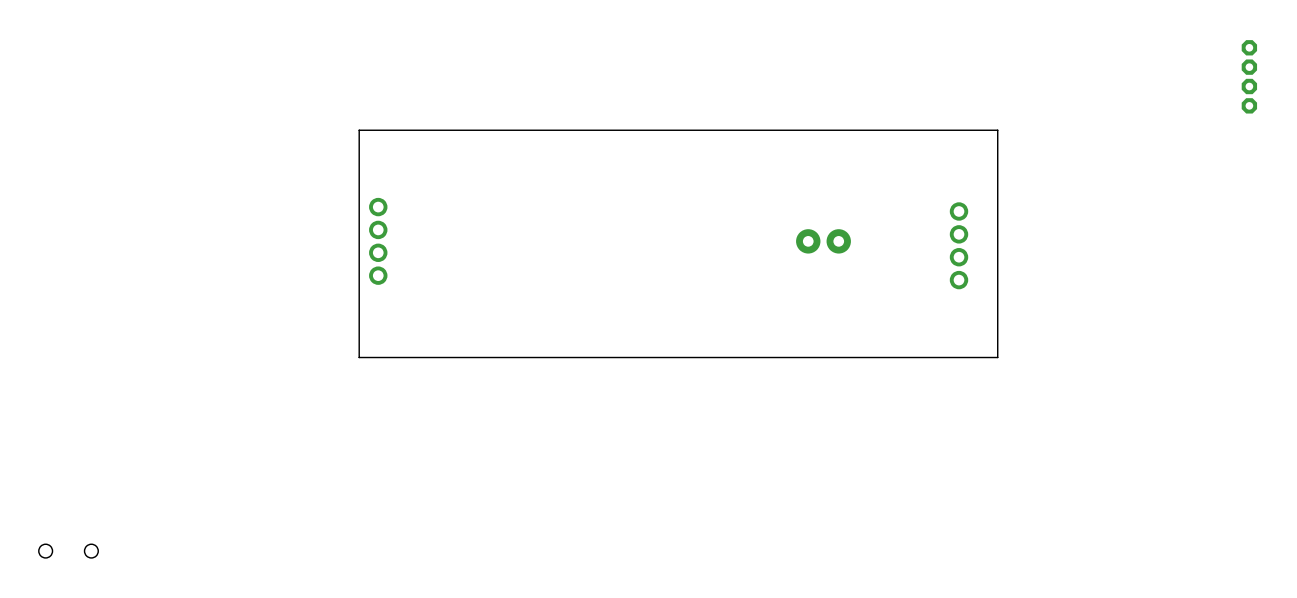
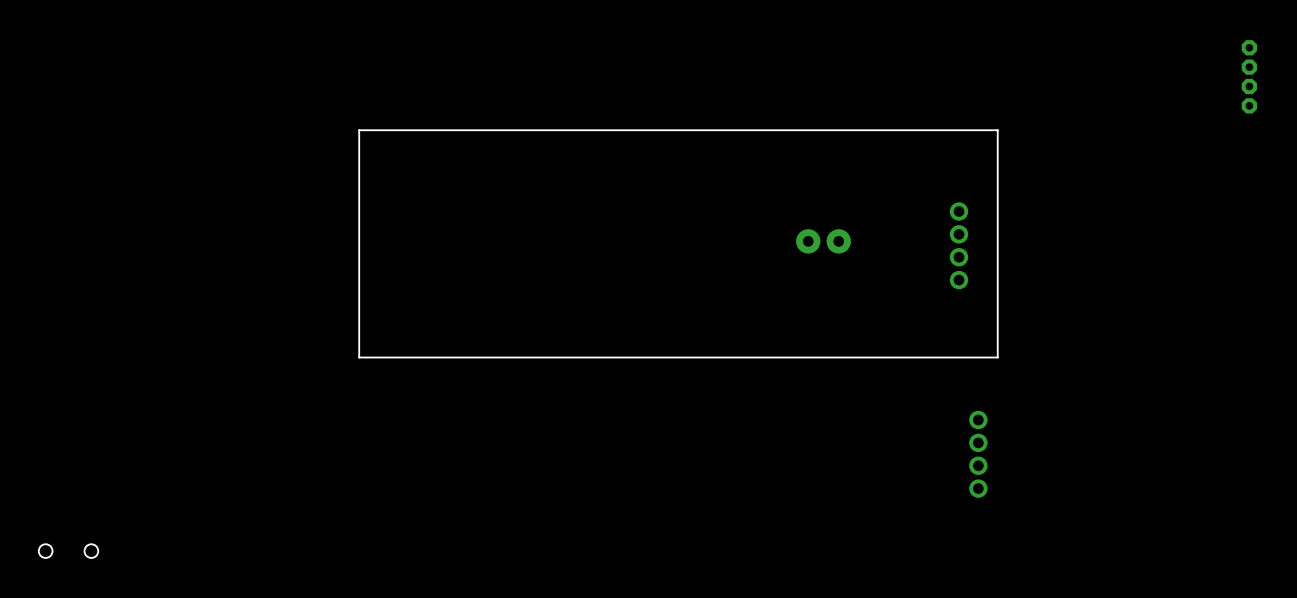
part: (378, 241) -> none
part: none -> (978, 454)

